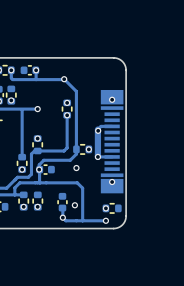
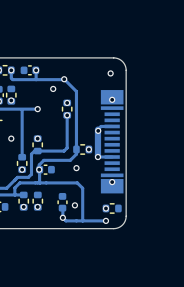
via: none -> (110, 73)
via: none -> (53, 88)
via: none -> (11, 138)

